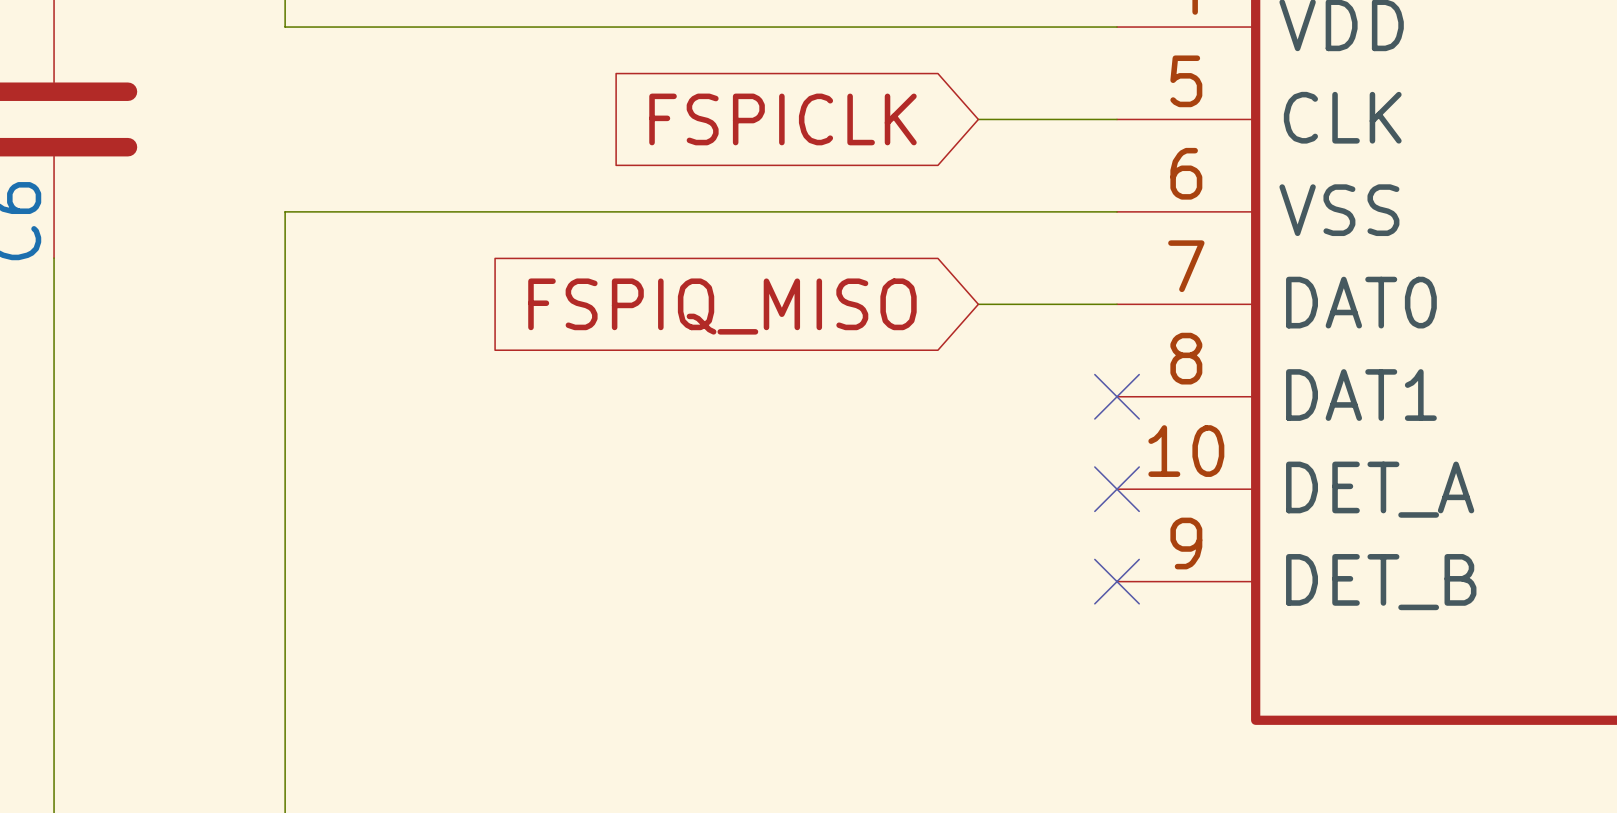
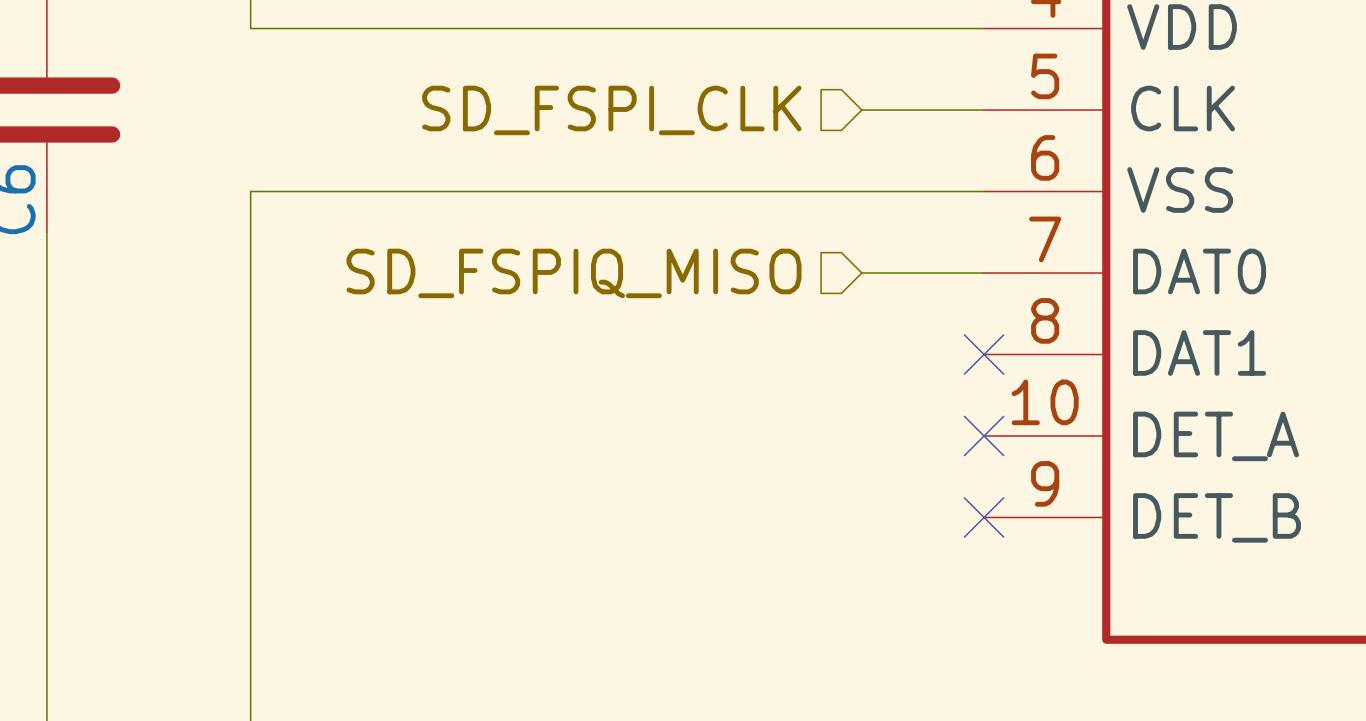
hierarchical label: none -> SD_FSPI_CLK (611, 110)
global label: FSPICLK (782, 119) -> none
hierarchical label: none -> SD_FSPIQ_MISO (574, 273)
global label: FSPIQ_MISO (722, 306) -> none

